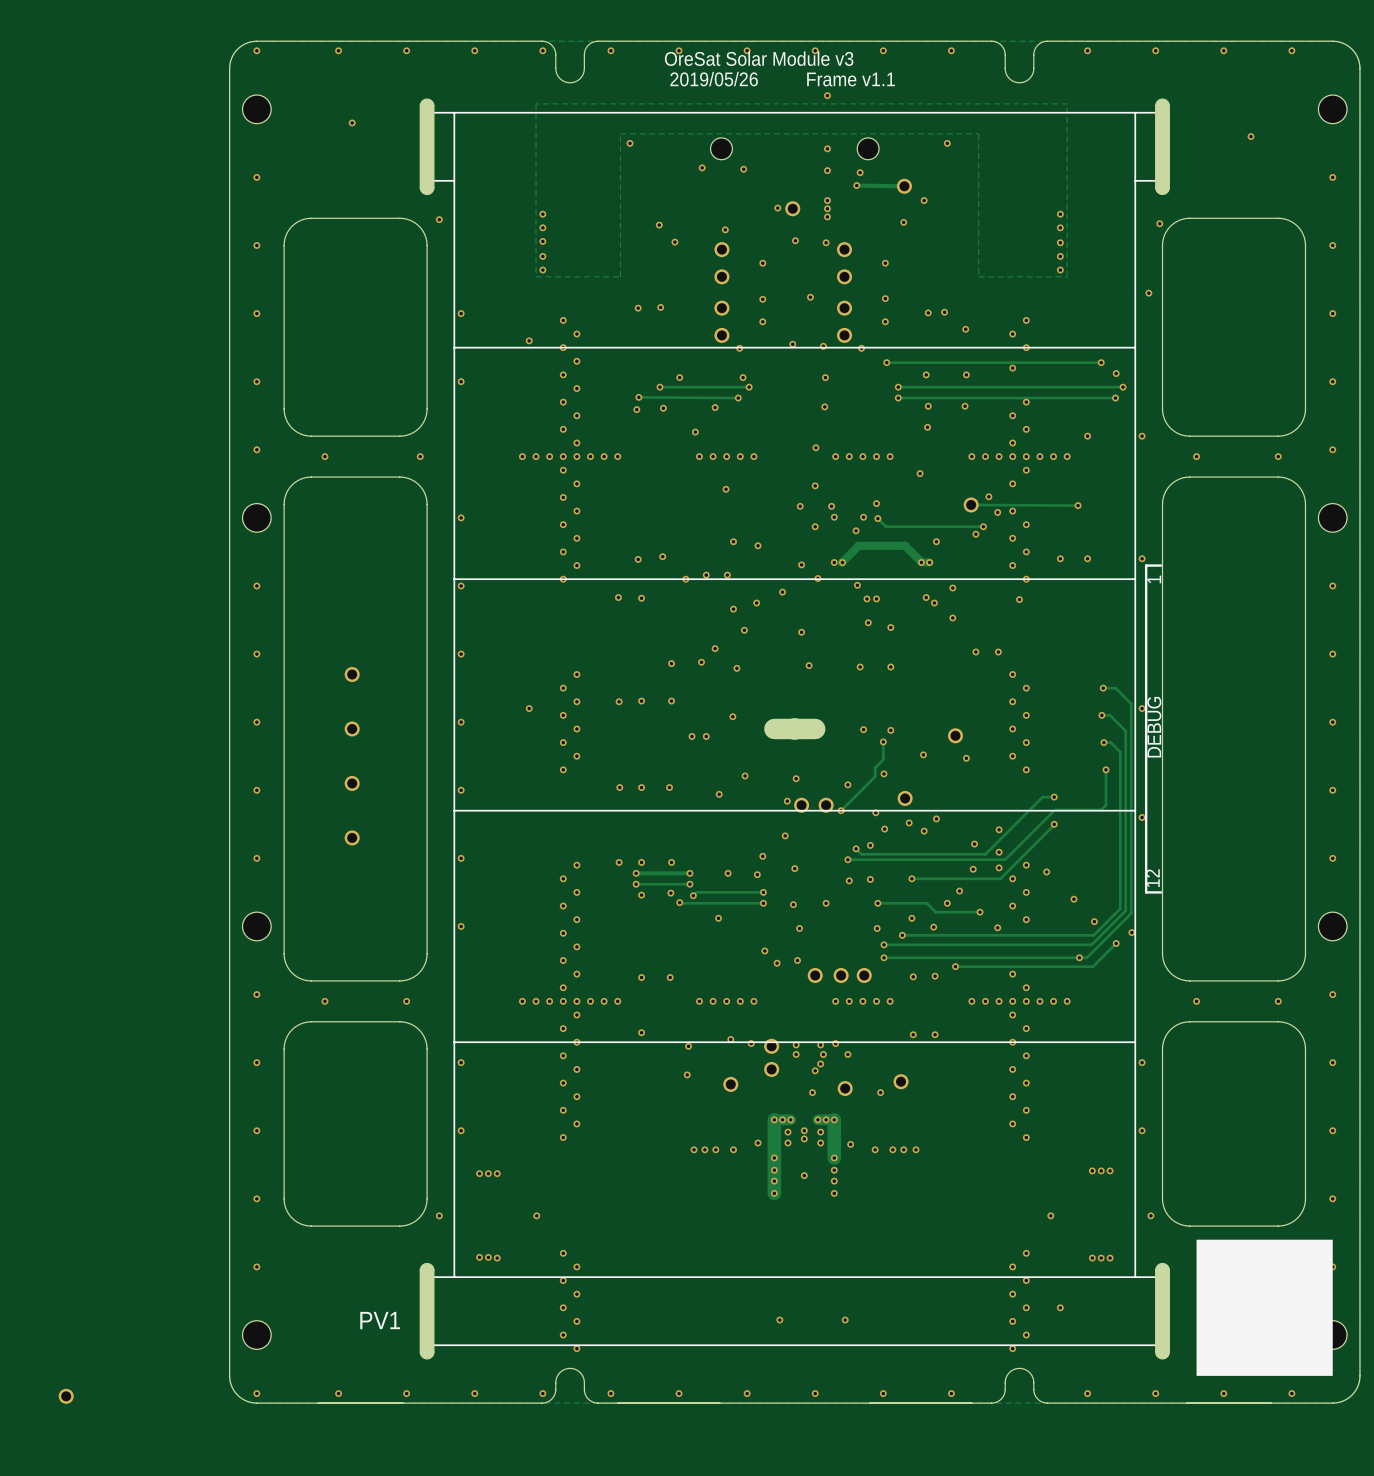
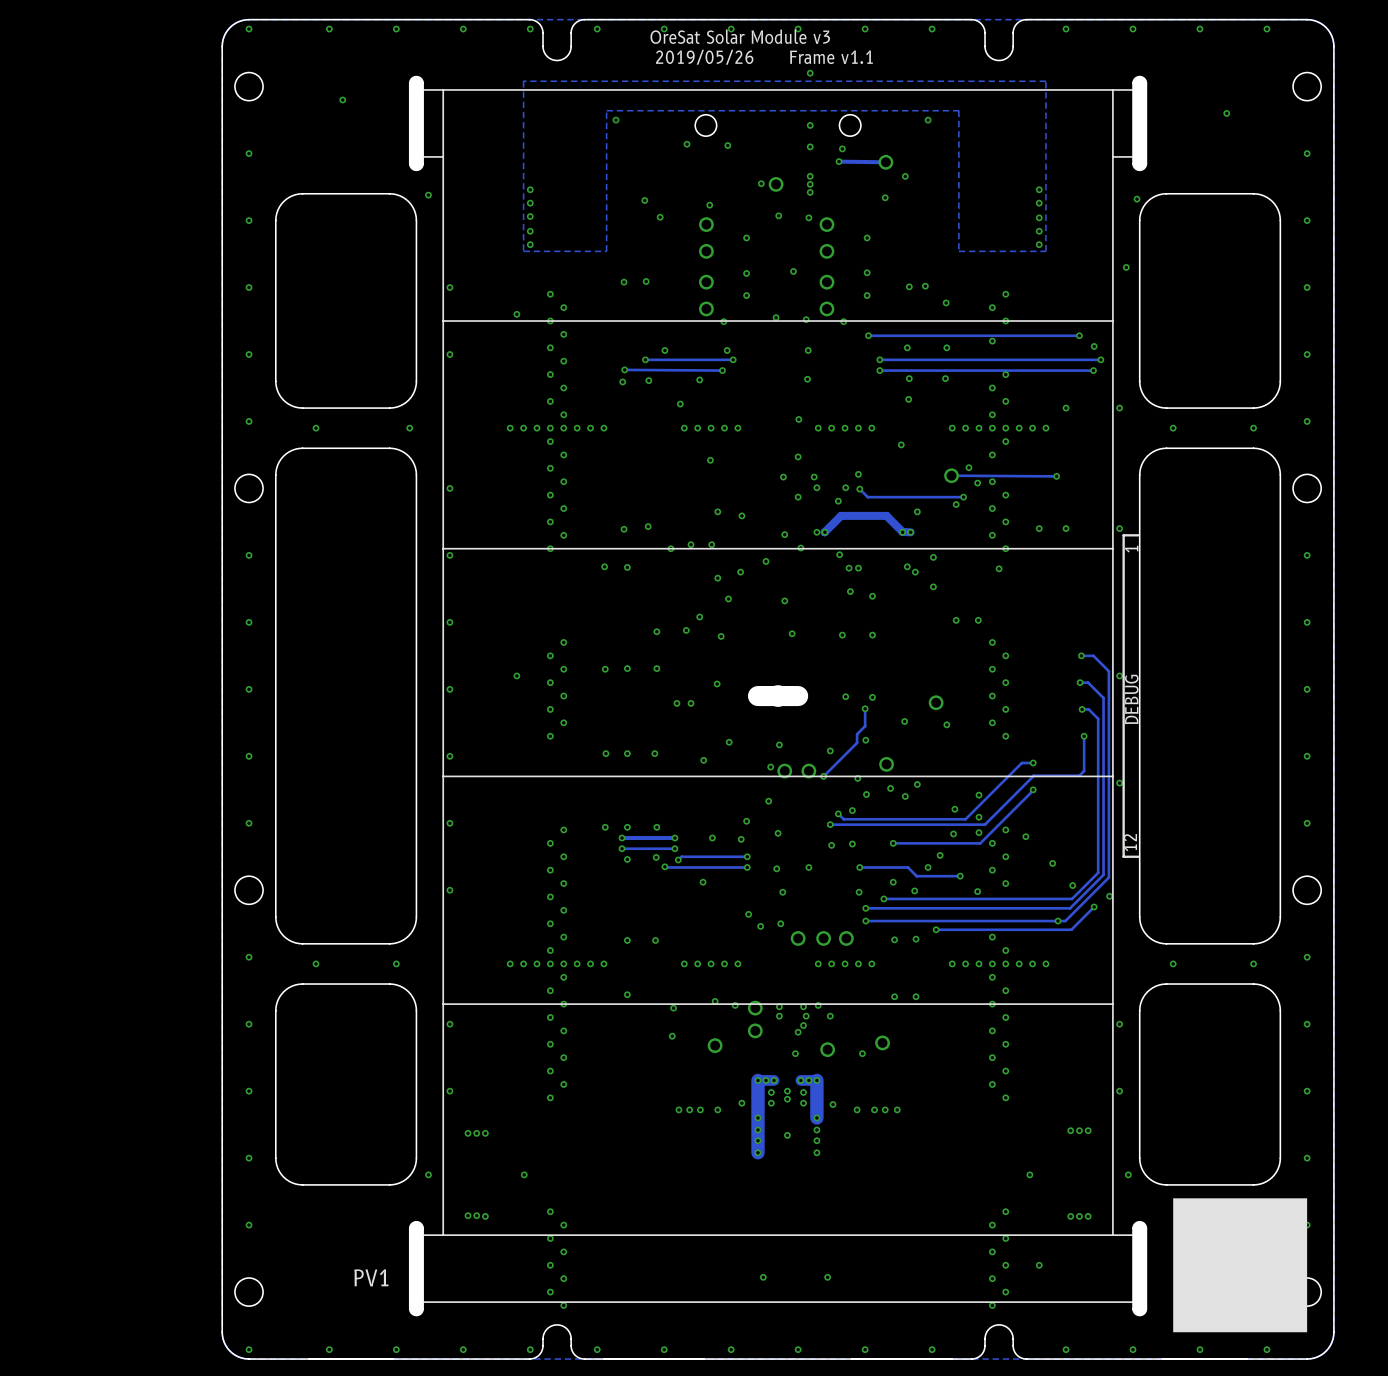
part: (352, 674) -> none
part: (352, 728) -> none
part: (352, 783) -> none
part: (352, 837) -> none
part: (66, 1396) -> none

